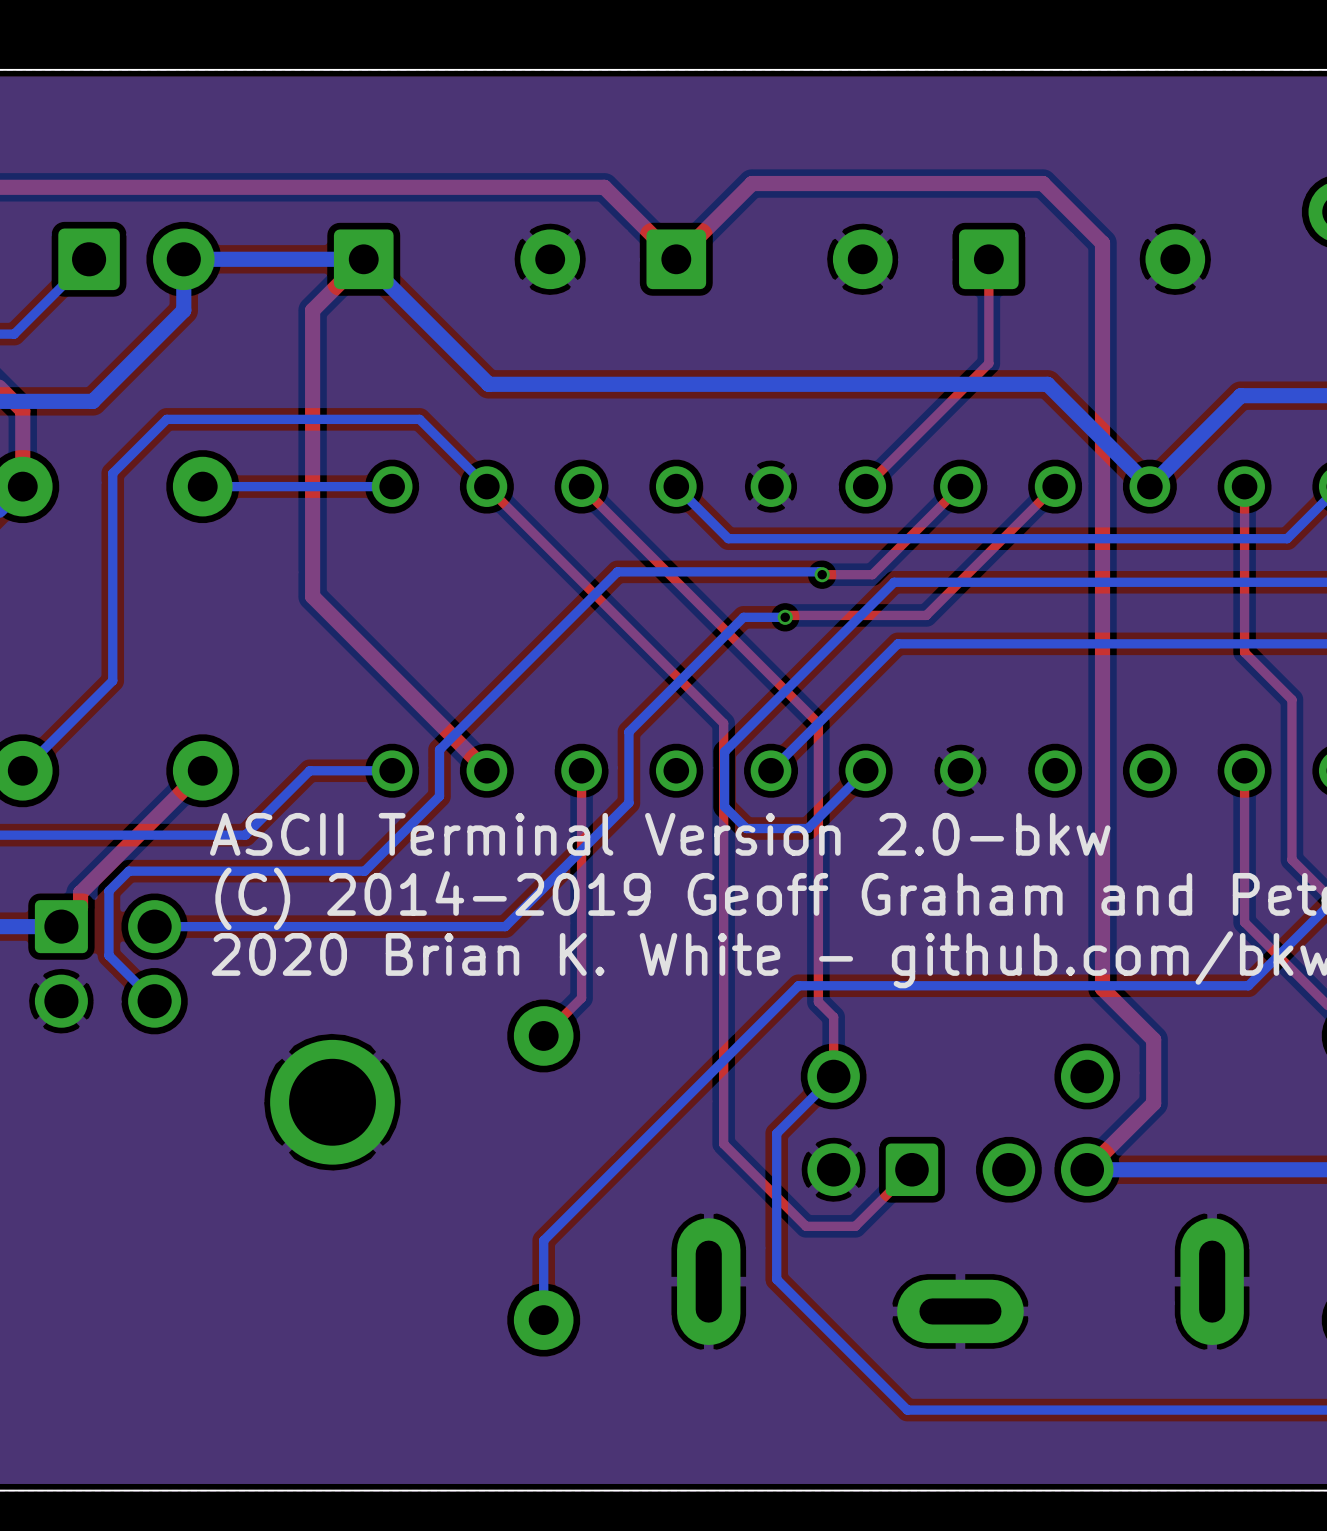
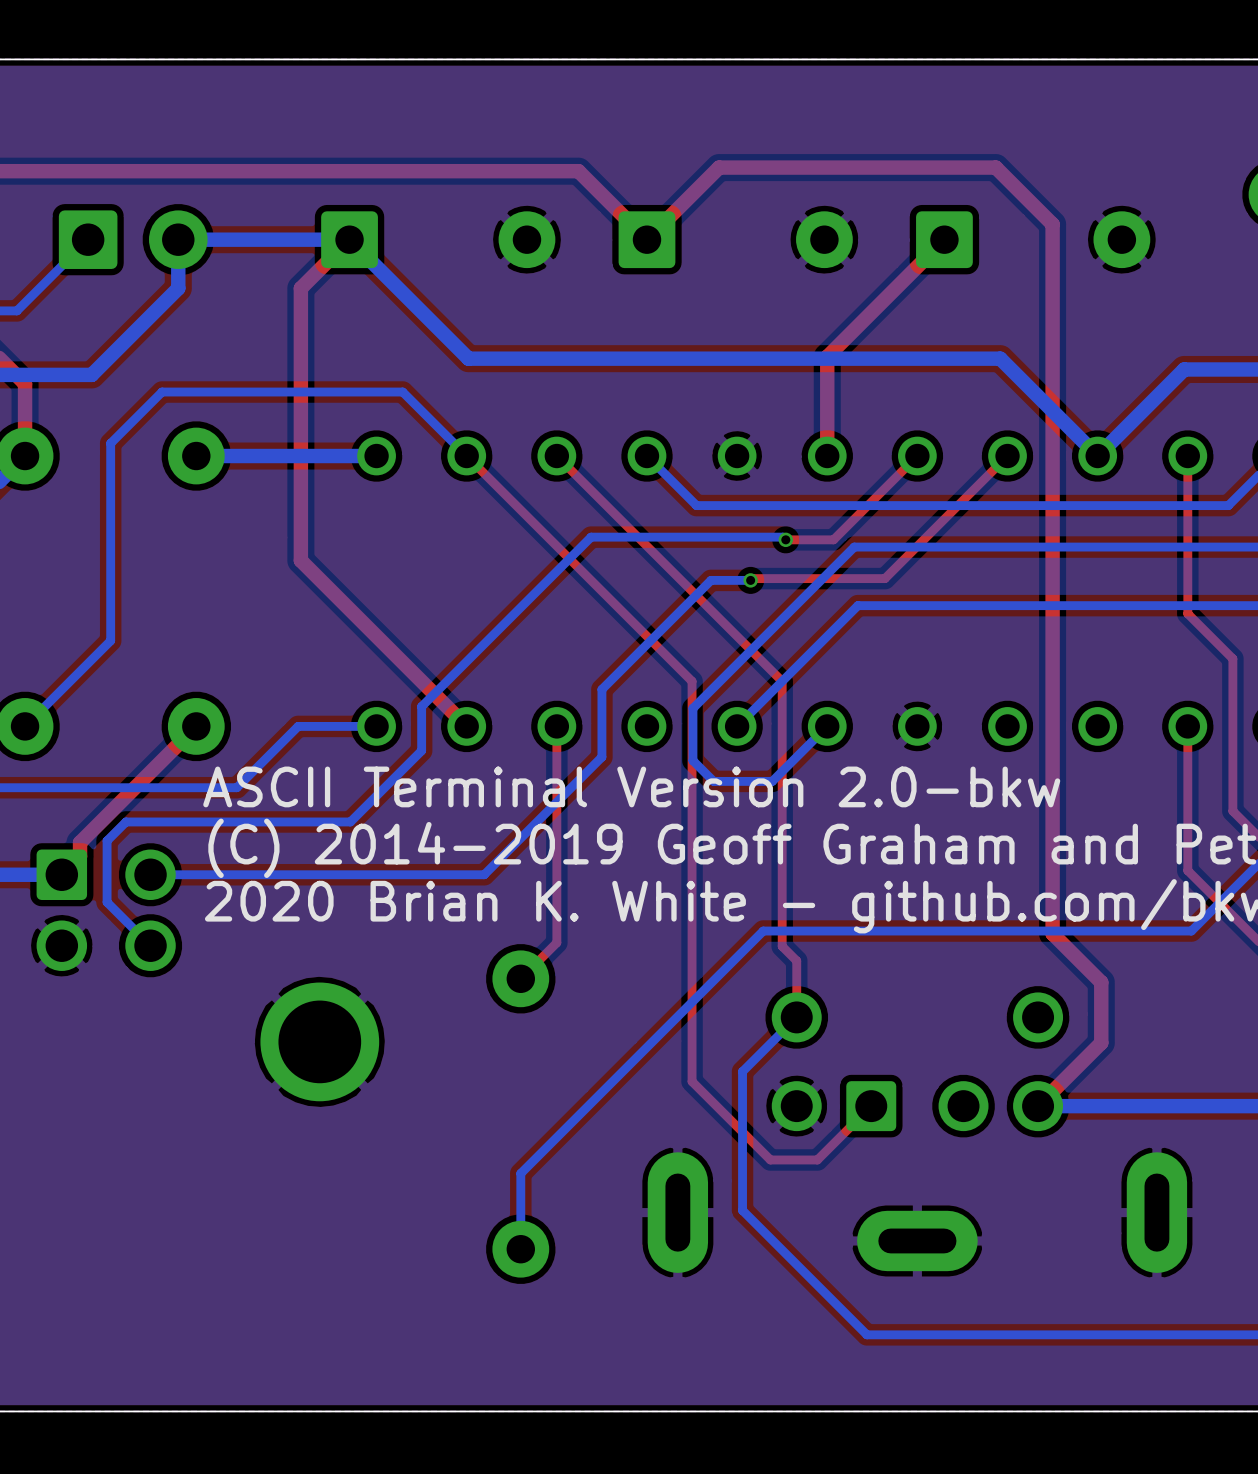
top track: (988, 259) (988, 363) (865, 486) -> (944, 239) (827, 356) (827, 456)
bottom track width: thin (392, 486) (202, 486) -> thick (376, 456) (196, 456)

